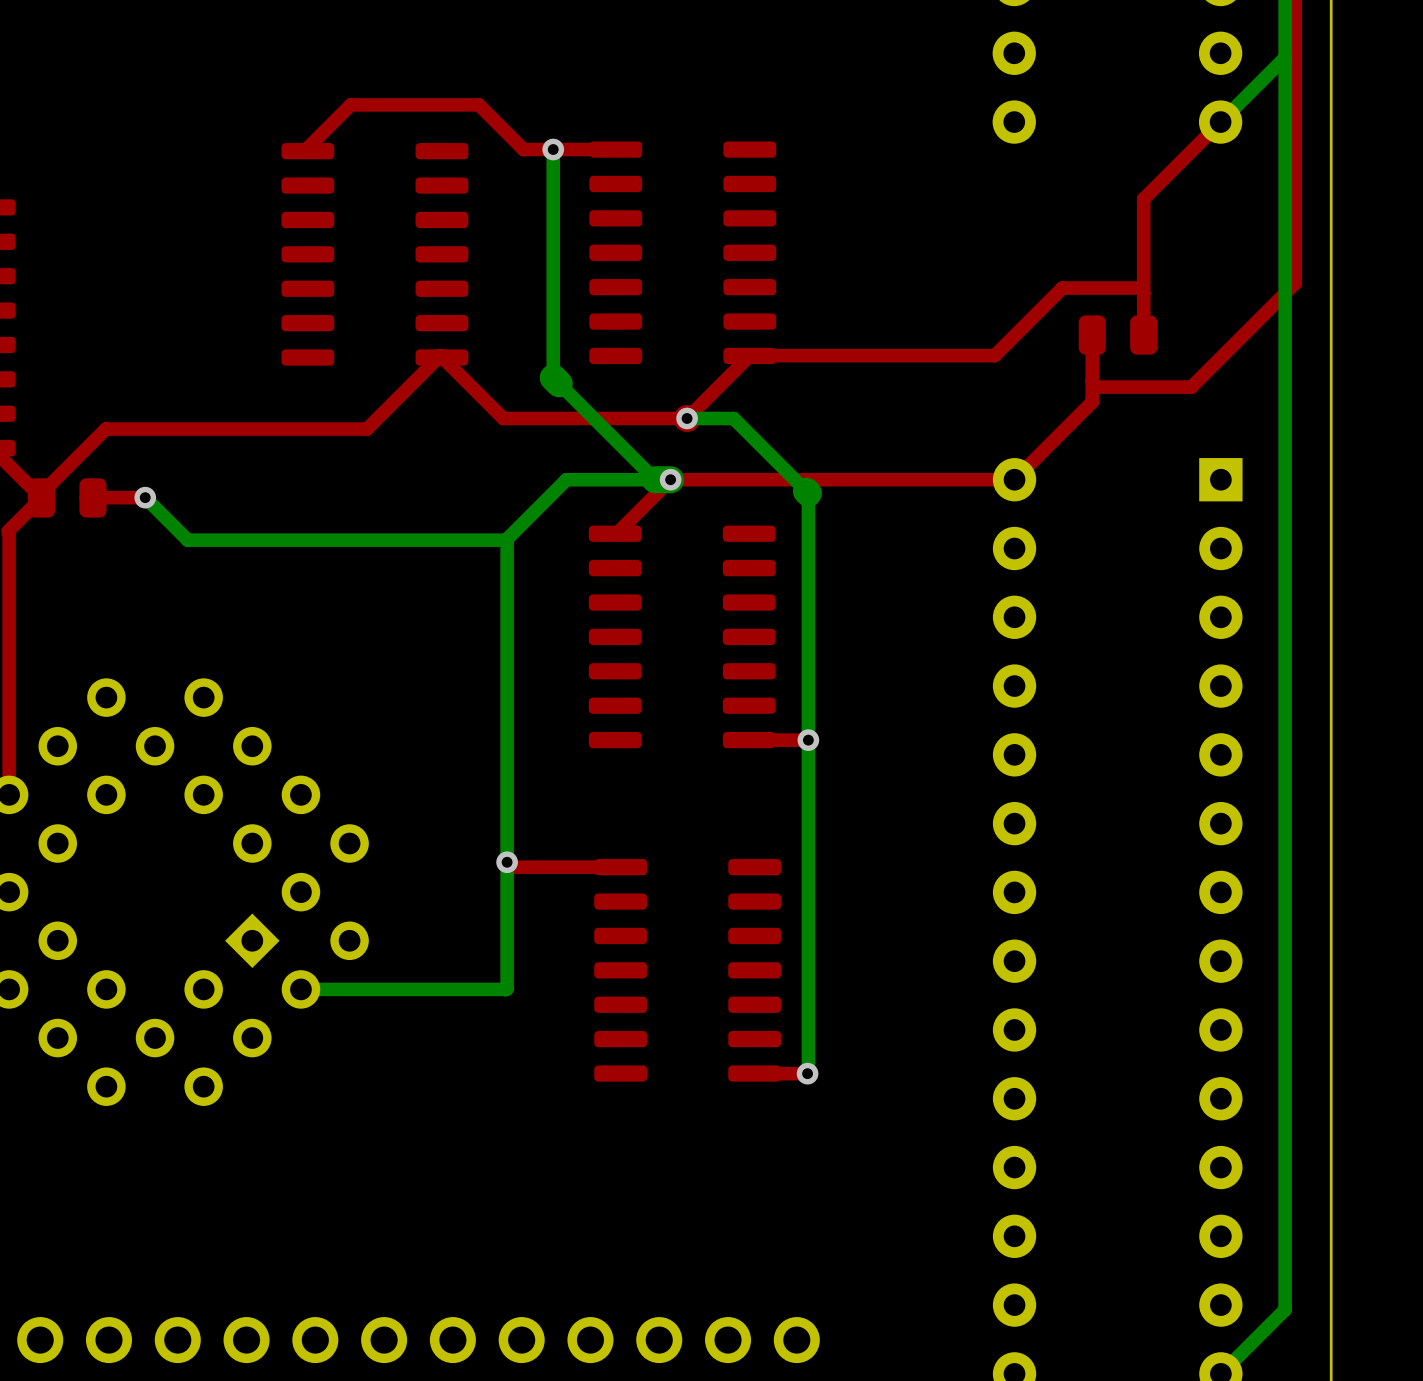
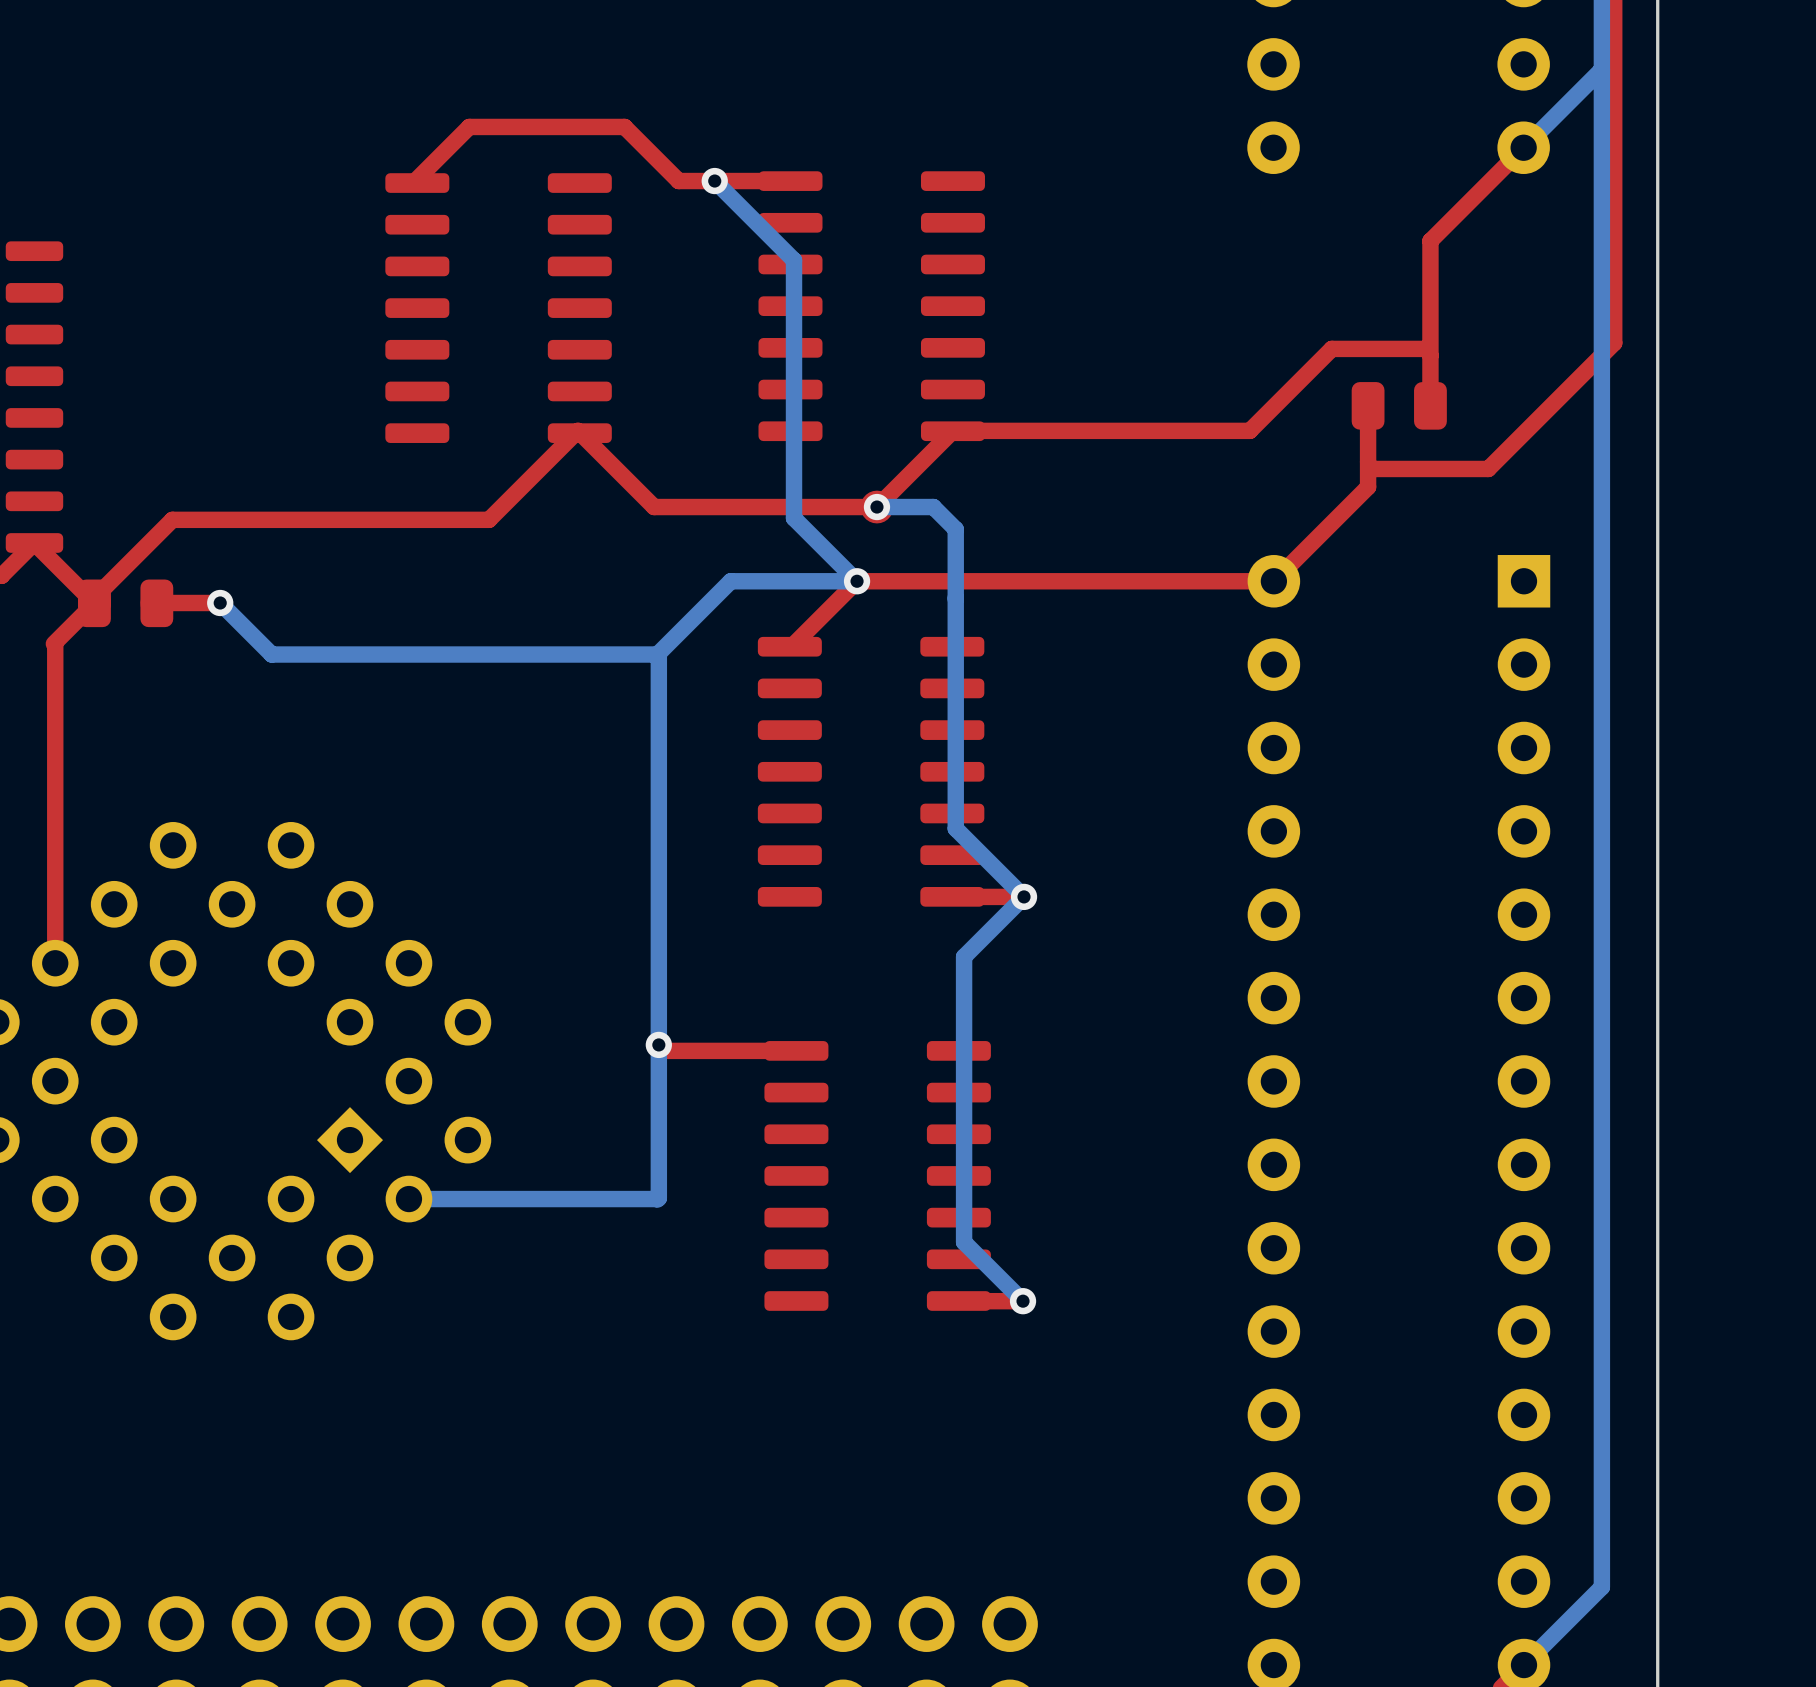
bottom track: (553, 149) (553, 377) (655, 479) (670, 479) -> (714, 181) (794, 260) (794, 518) (857, 581)
bottom track: (752, 436) (808, 493) (807, 1073) -> (955, 529) (955, 828) (1024, 896) (964, 956) (964, 1242) (1023, 1301)

